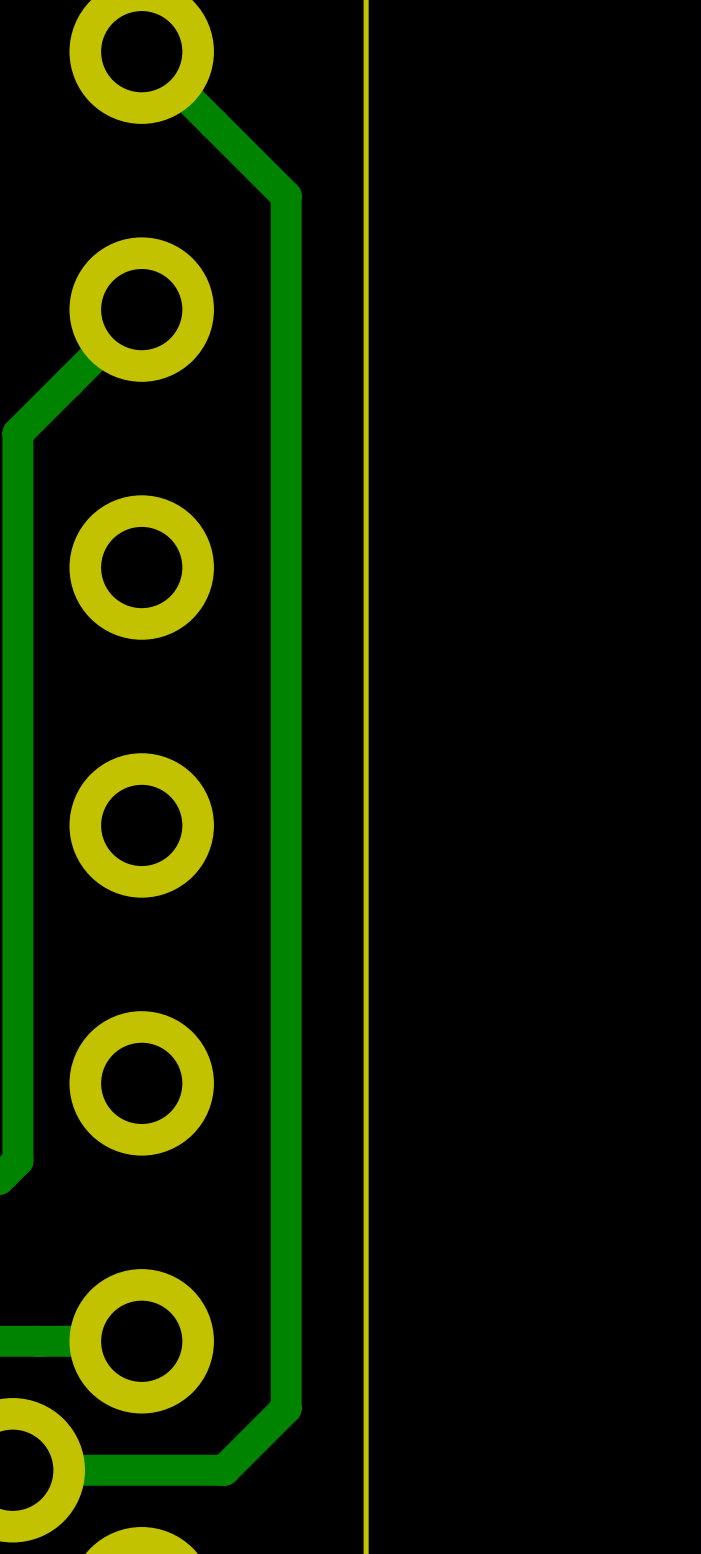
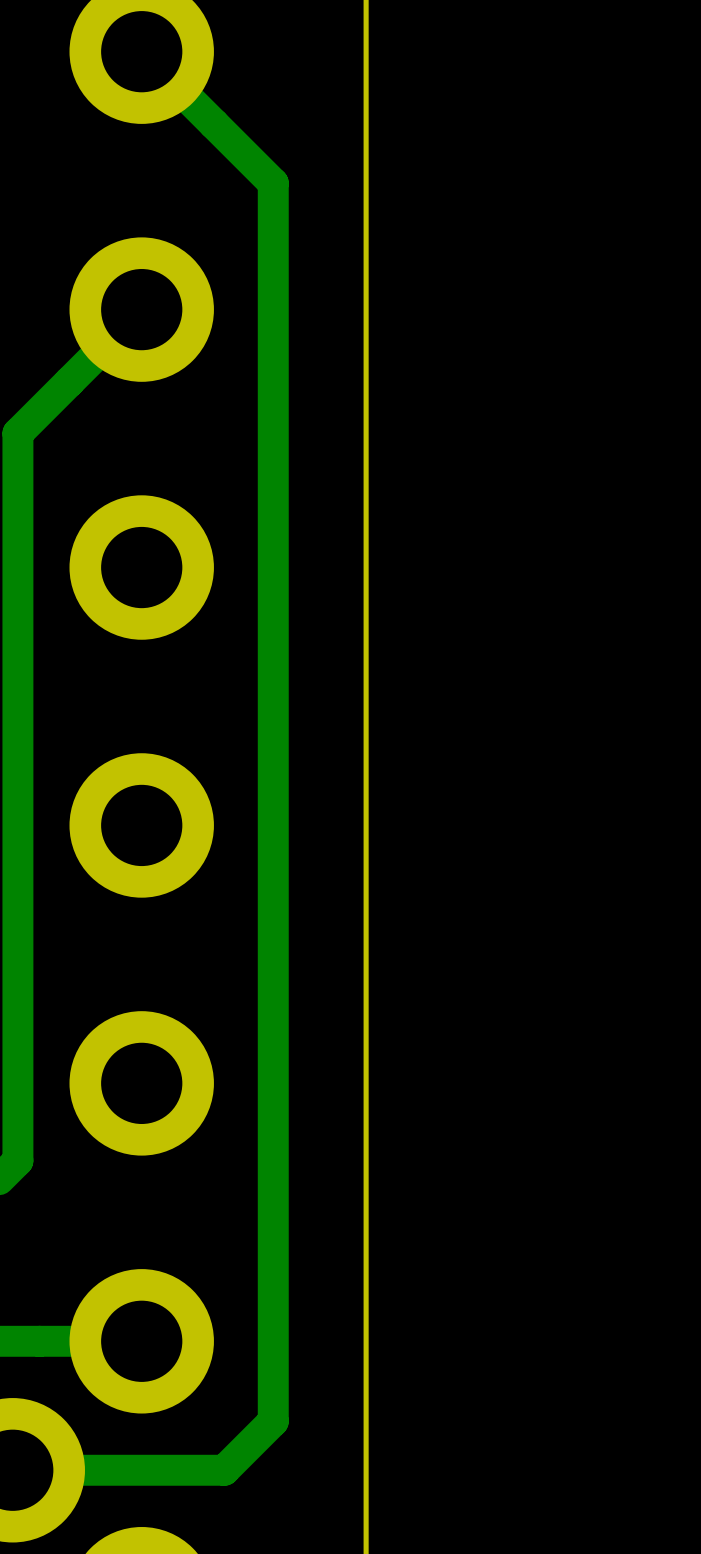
track: (273, 183) (286, 196) (286, 1408) (273, 1421) -> (273, 183) (273, 1421)

